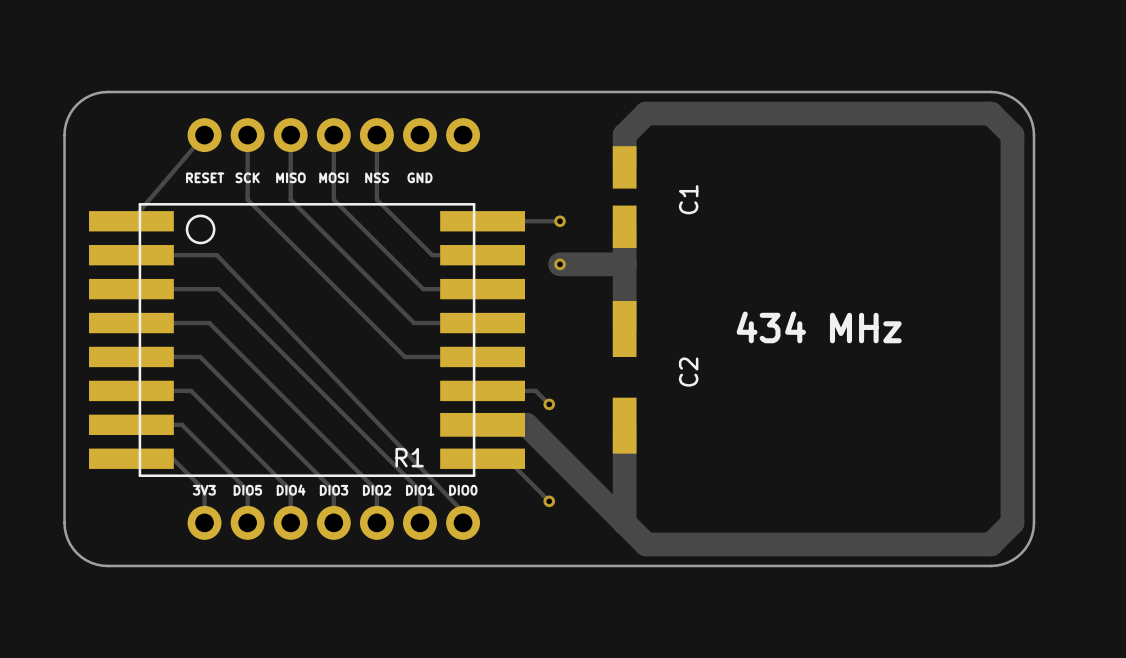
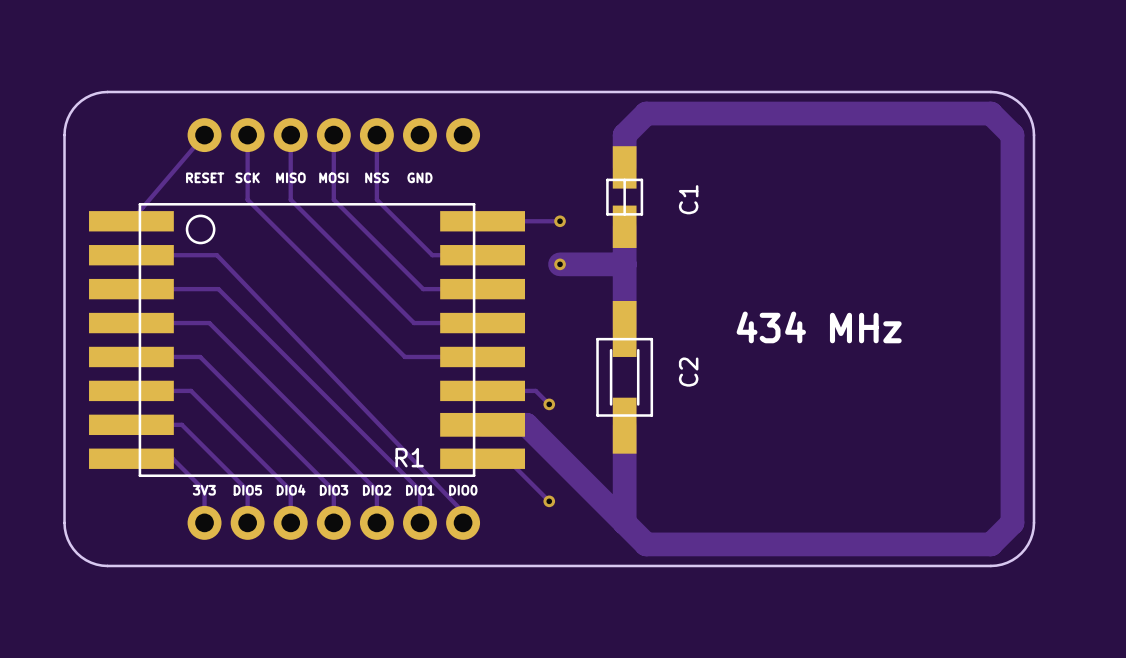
C1 footprint: [612, 146, 637, 248] -> [606, 146, 644, 248]
C2 footprint: [612, 300, 637, 454] -> [596, 300, 654, 454]

